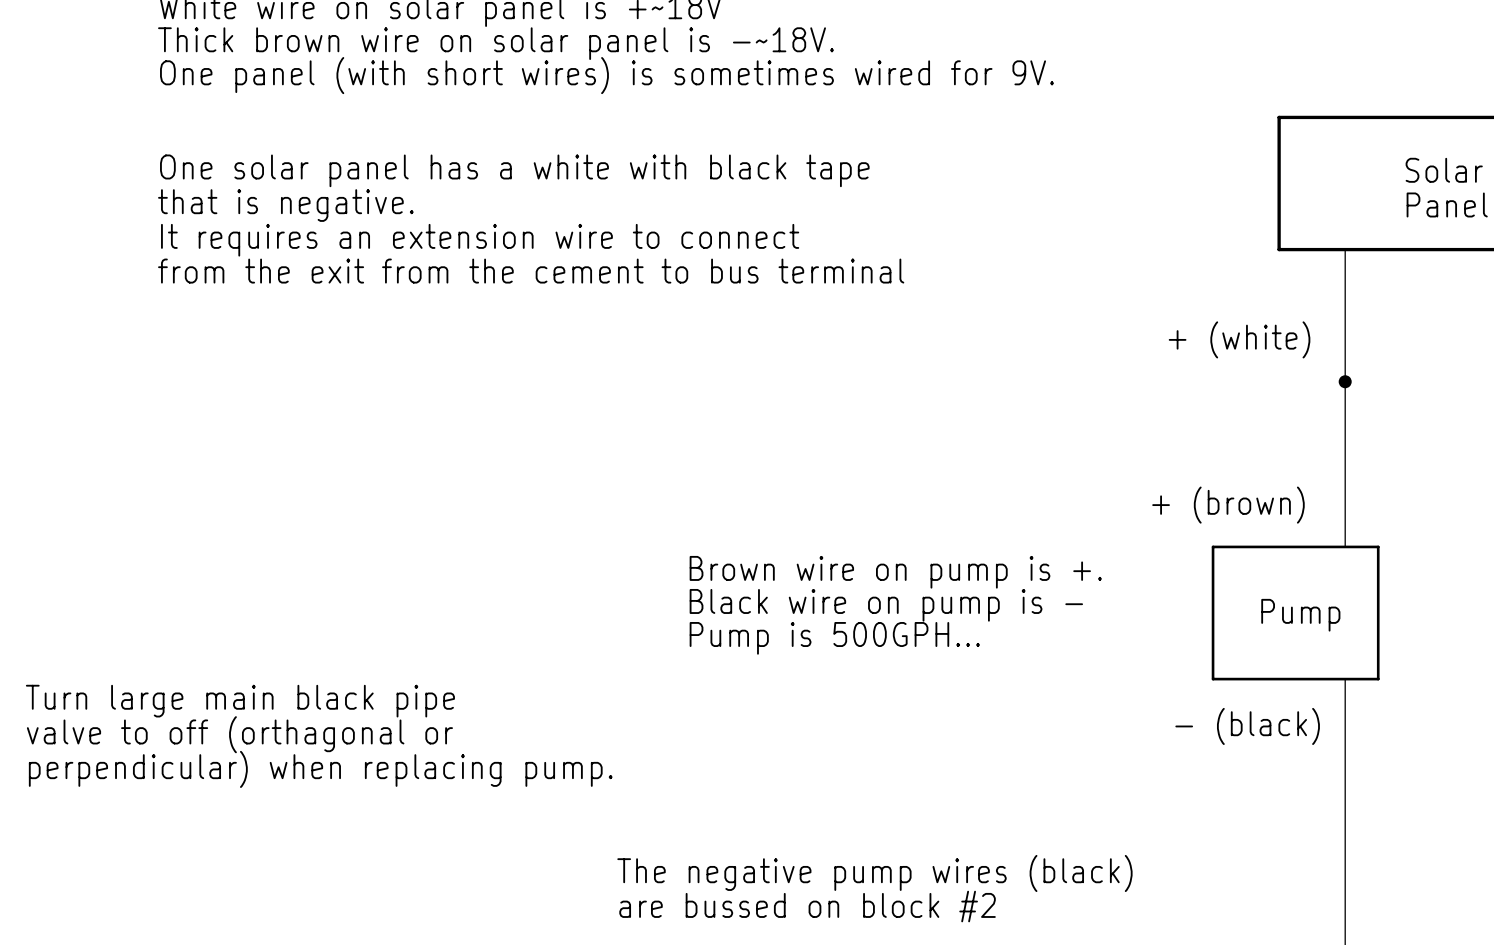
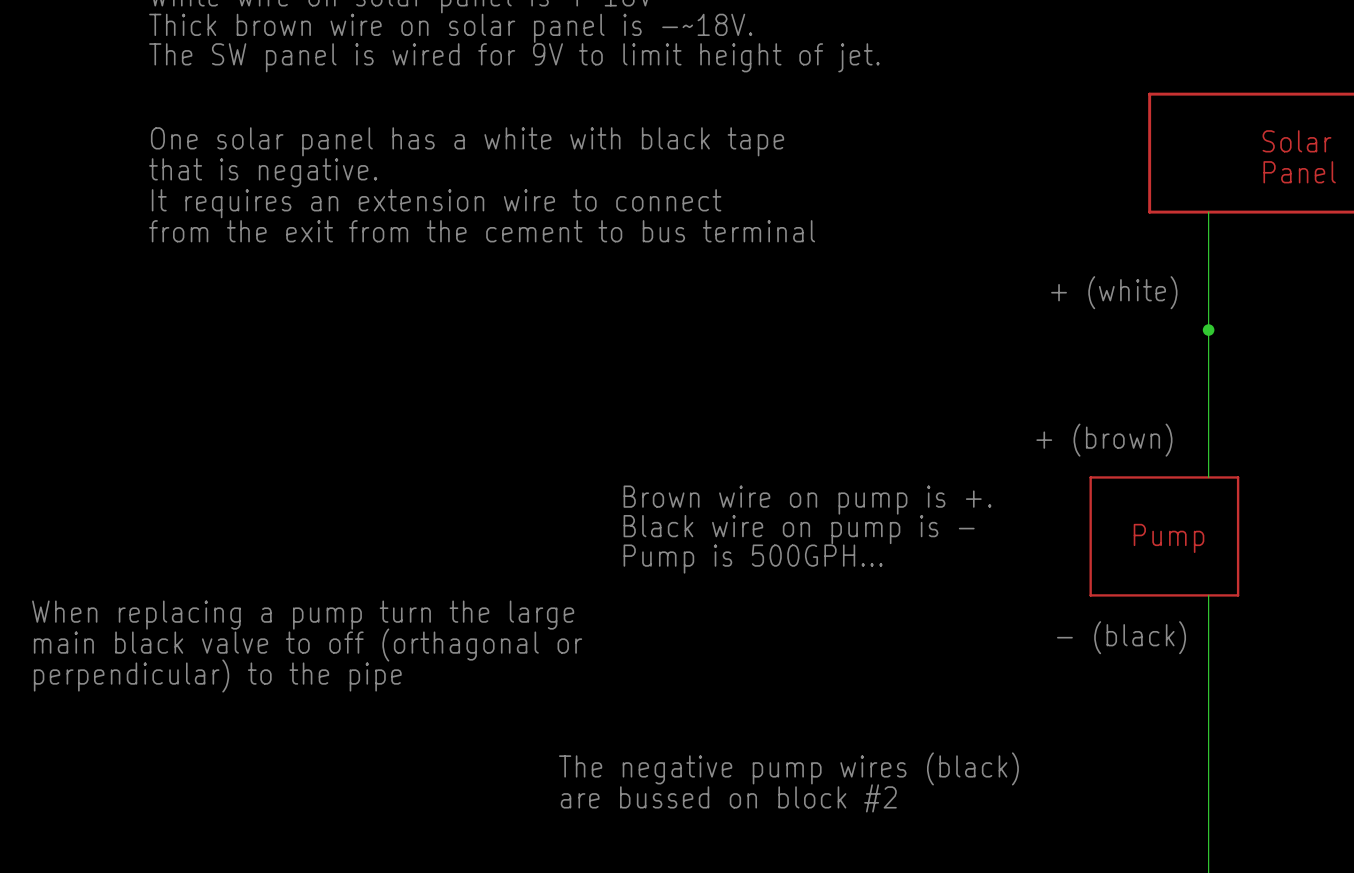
text: One panel (with short wires) is sometimes wired for 9V. (606, 75) -> The SW panel is wired for 9V to limit height of jet. (514, 57)
text: Turn large main black pipe (240, 701) -> When replacing a pump turn the large (303, 615)
text: valve to off (orthagonal or (239, 734) -> main black valve to off (orthagonal or (308, 645)
text: perpendicular) when replacing pump. (320, 769) -> perpendicular) to the pipe (217, 676)

